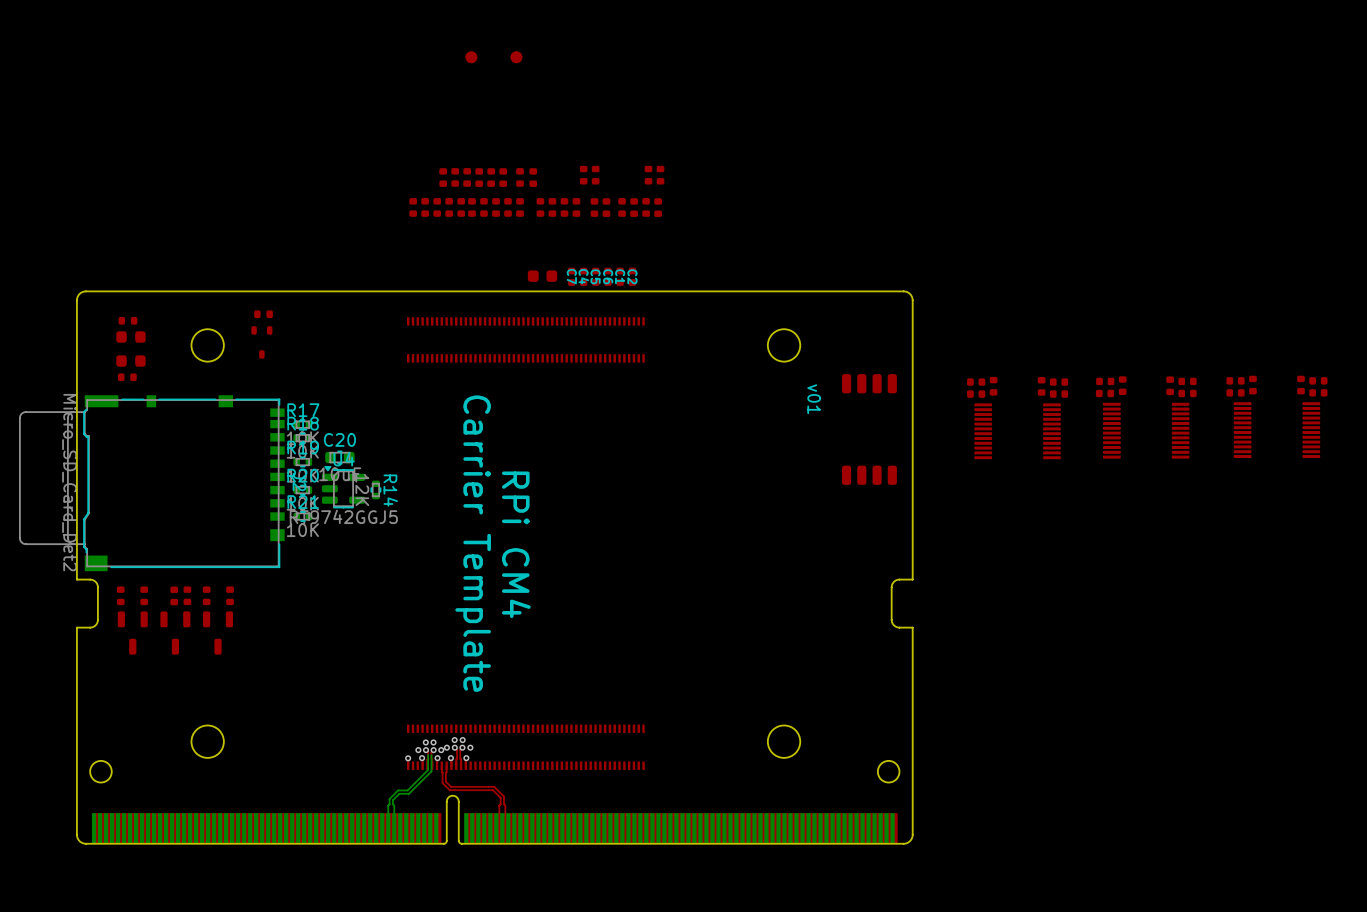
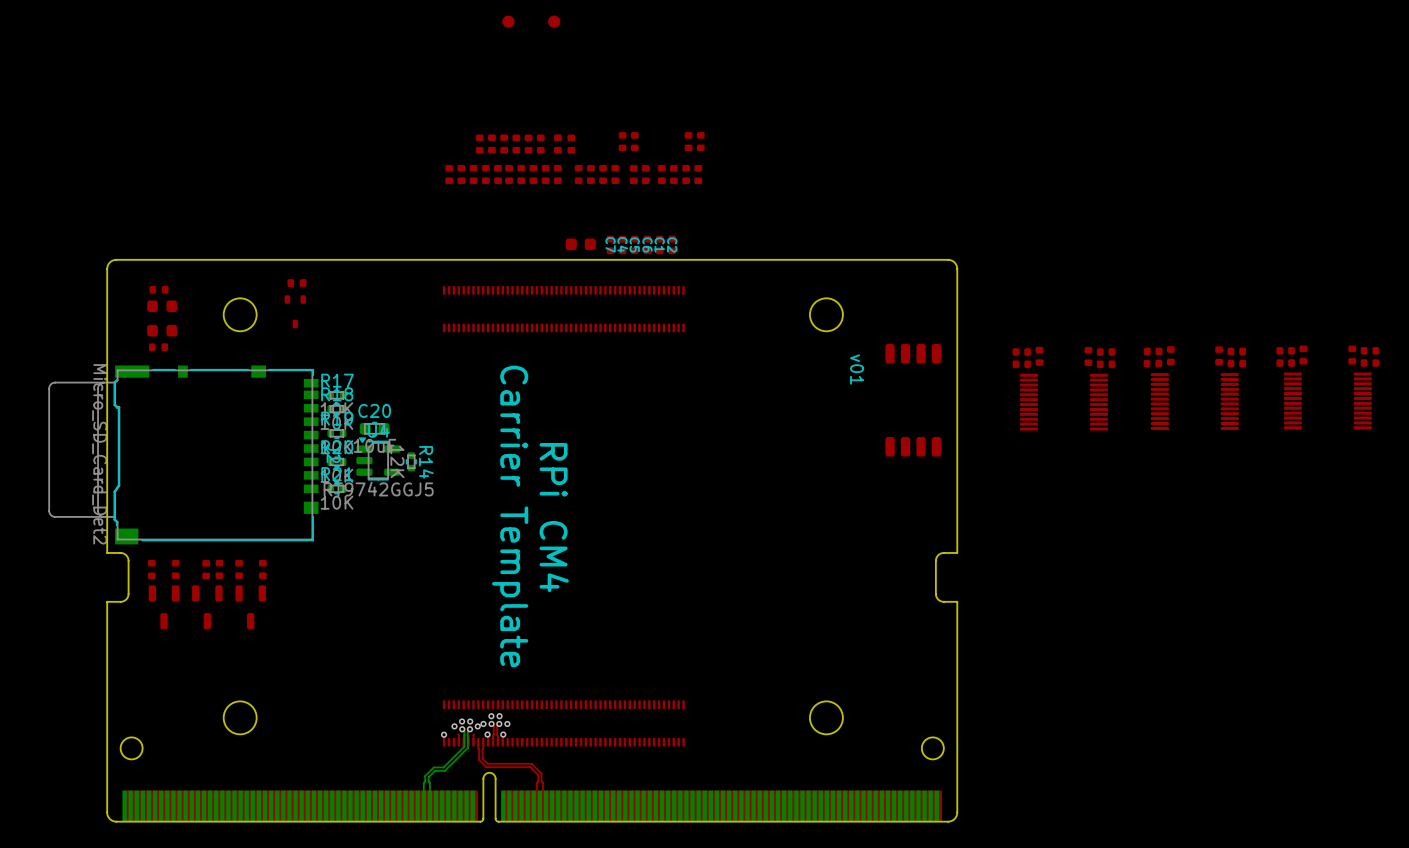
via: (425, 742) -> none
via: (433, 742) -> none
via: none -> (462, 721)
via: none -> (470, 721)
via: (426, 750) -> none
via: (433, 750) -> none
via: none -> (462, 729)
via: none -> (470, 729)
via: (422, 758) -> none
via: (437, 758) -> none

